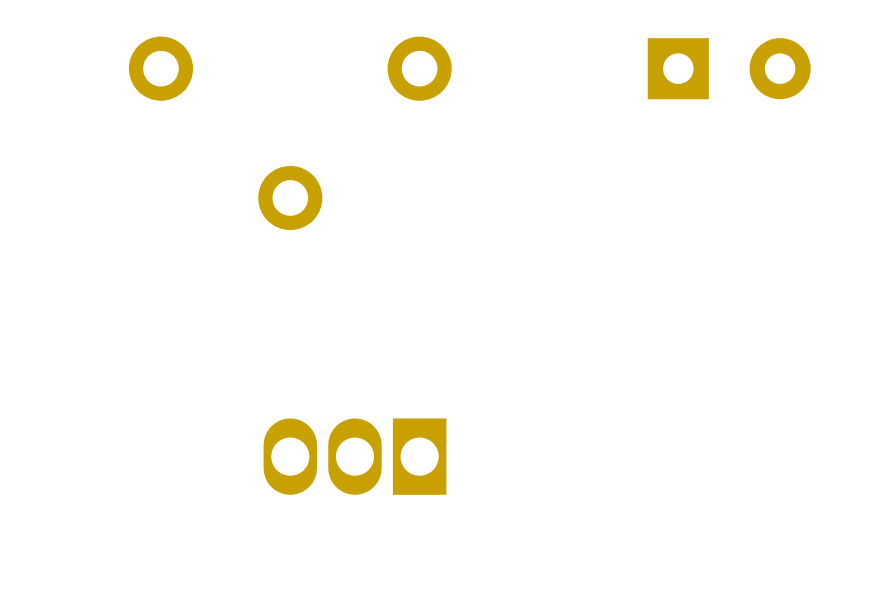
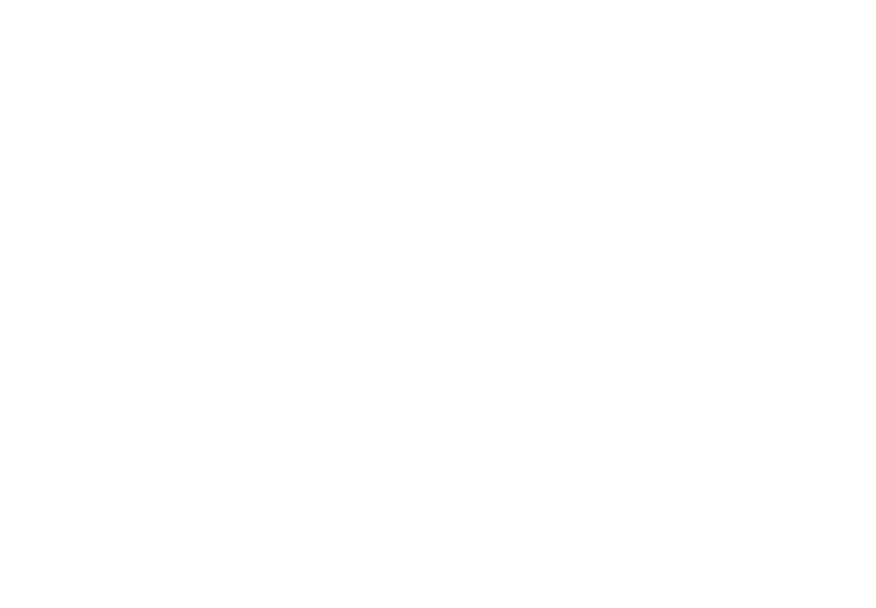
part: (729, 68) -> none
part: (290, 133) -> none
part: (354, 456) -> none

